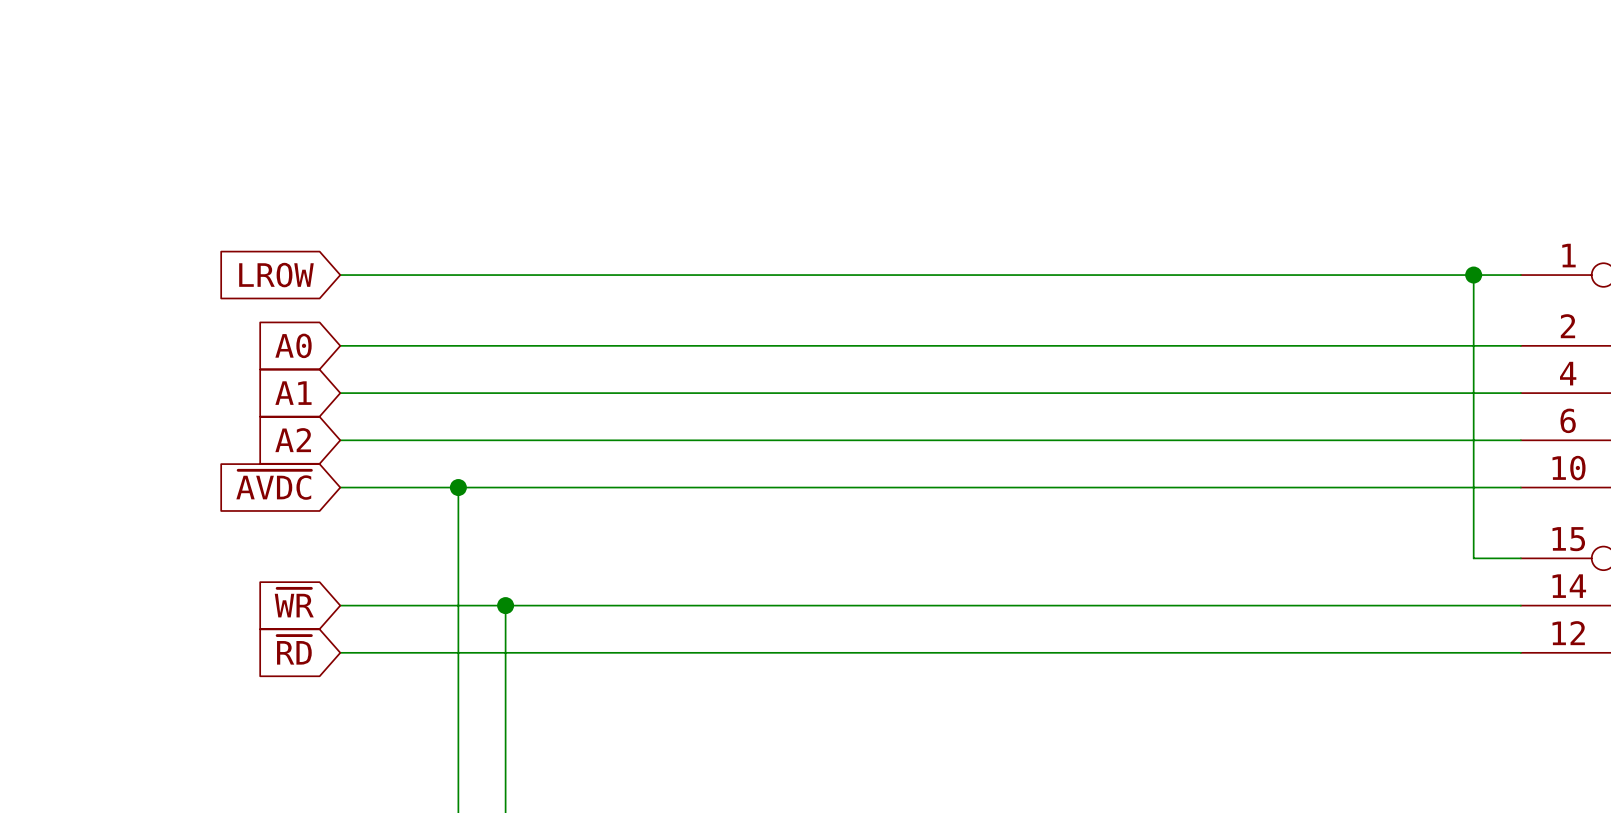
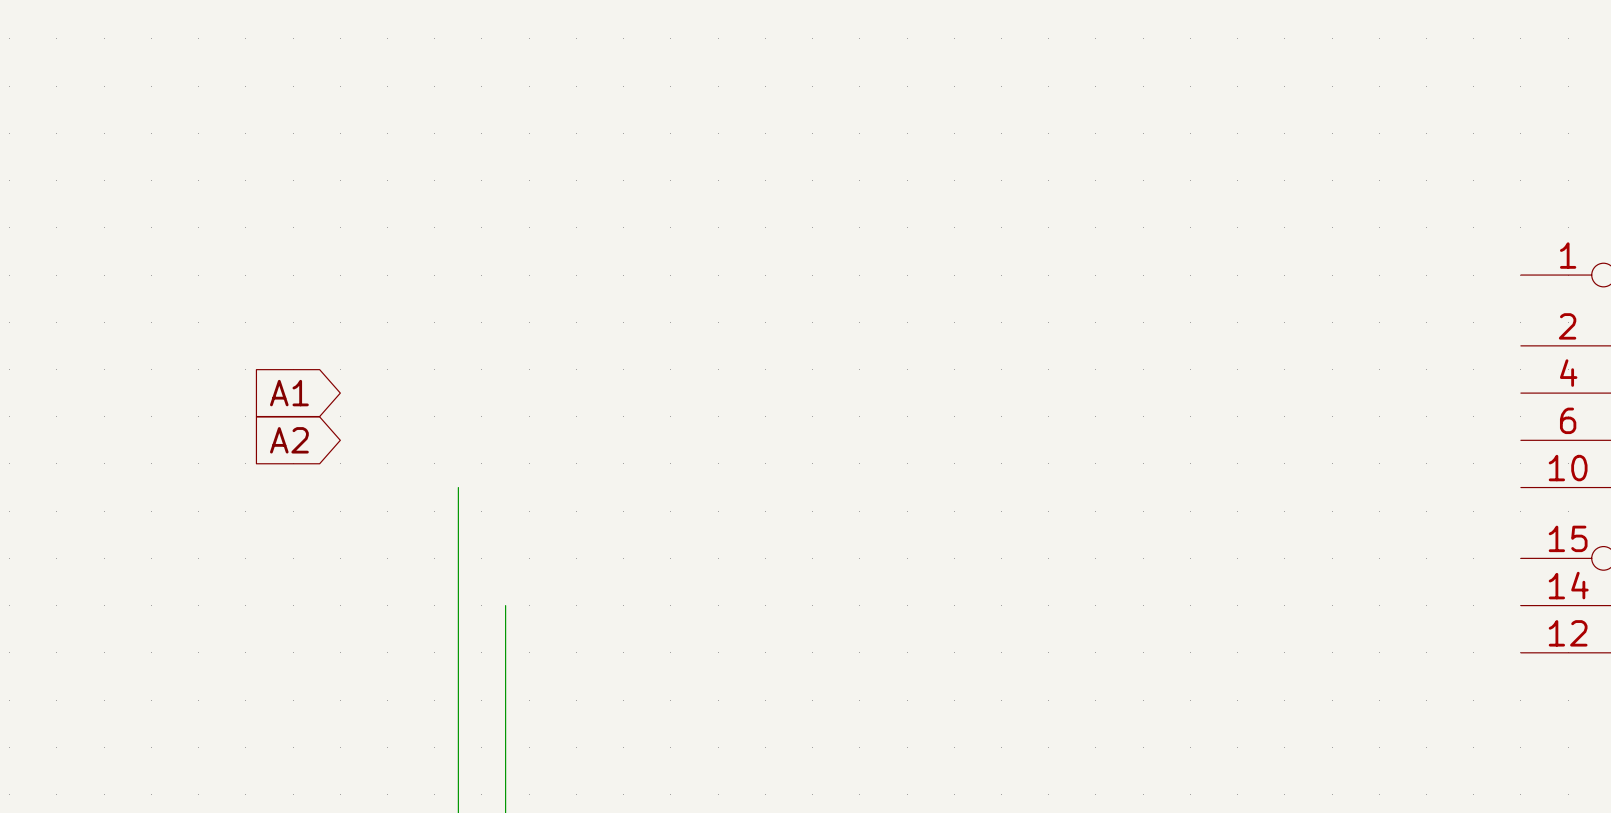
global label: LROW (276, 275) -> none
wire: (340, 275) (1520, 275) -> none
wire: (1473, 275) (1473, 558) (1520, 558) -> none
junction: (1473, 275) -> none
global label: A0 (293, 345) -> none
wire: (340, 345) (1520, 345) -> none
wire: (340, 393) (1520, 393) -> none
wire: (340, 440) (1520, 440) -> none
global label: ~{AVDC} (273, 485) -> none
wire: (340, 487) (1520, 487) -> none
junction: (458, 487) -> none
global label: ~{WR} (294, 602) -> none
wire: (340, 605) (1520, 605) -> none
junction: (505, 605) -> none
global label: ~{RD} (294, 650) -> none
wire: (340, 652) (1520, 652) -> none

